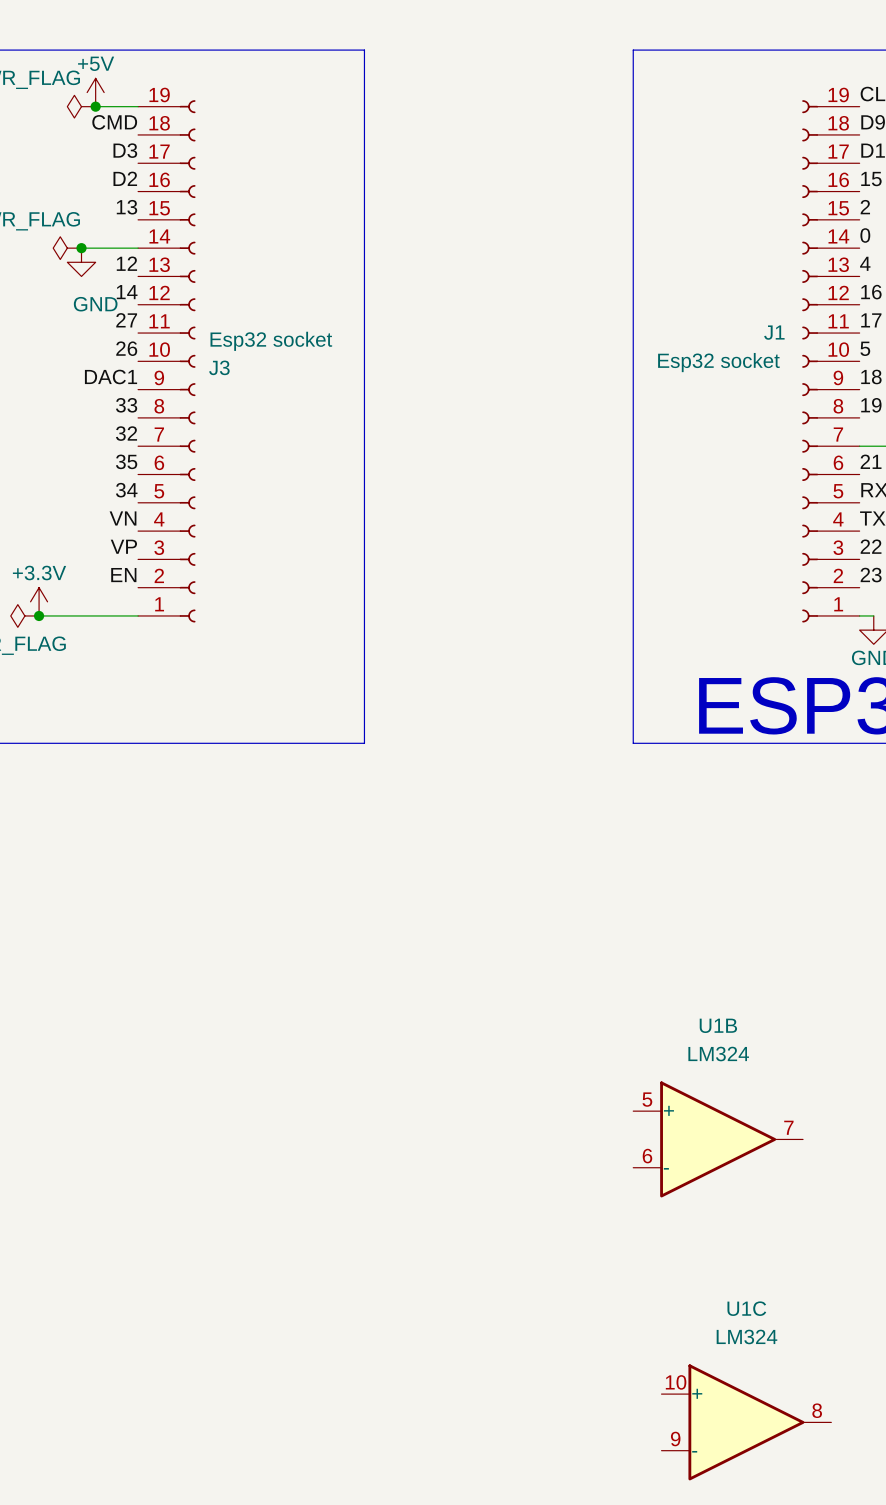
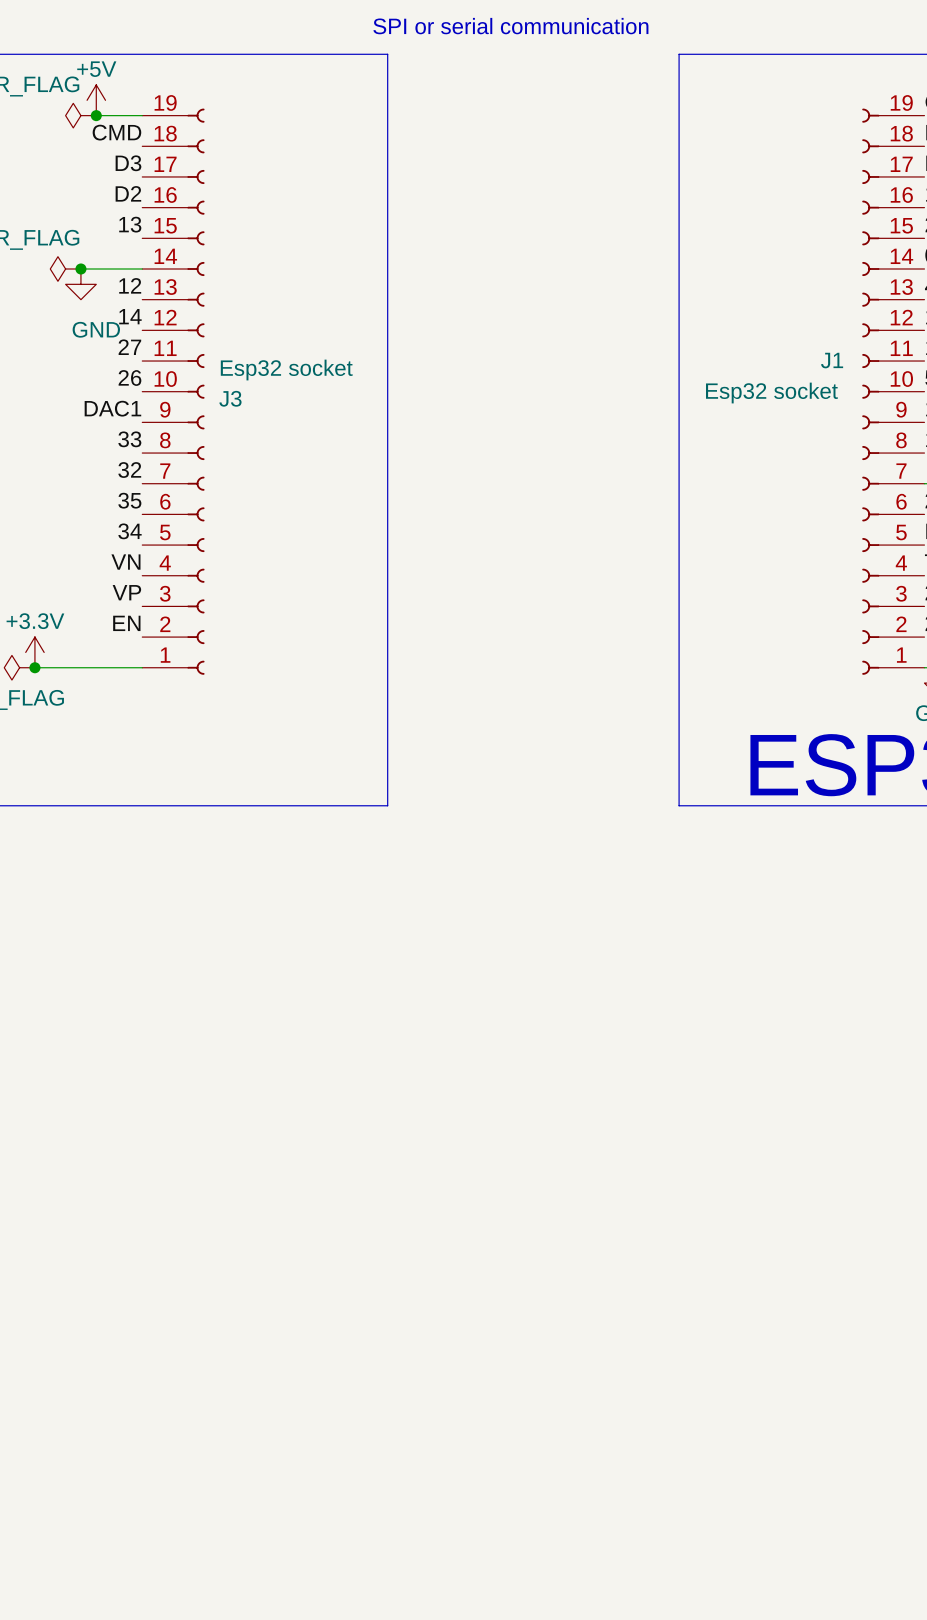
text: none -> SPI or serial communication (510, 26)
U1B: LM324 (718, 1139) -> none
U1C: LM324 (746, 1422) -> none

